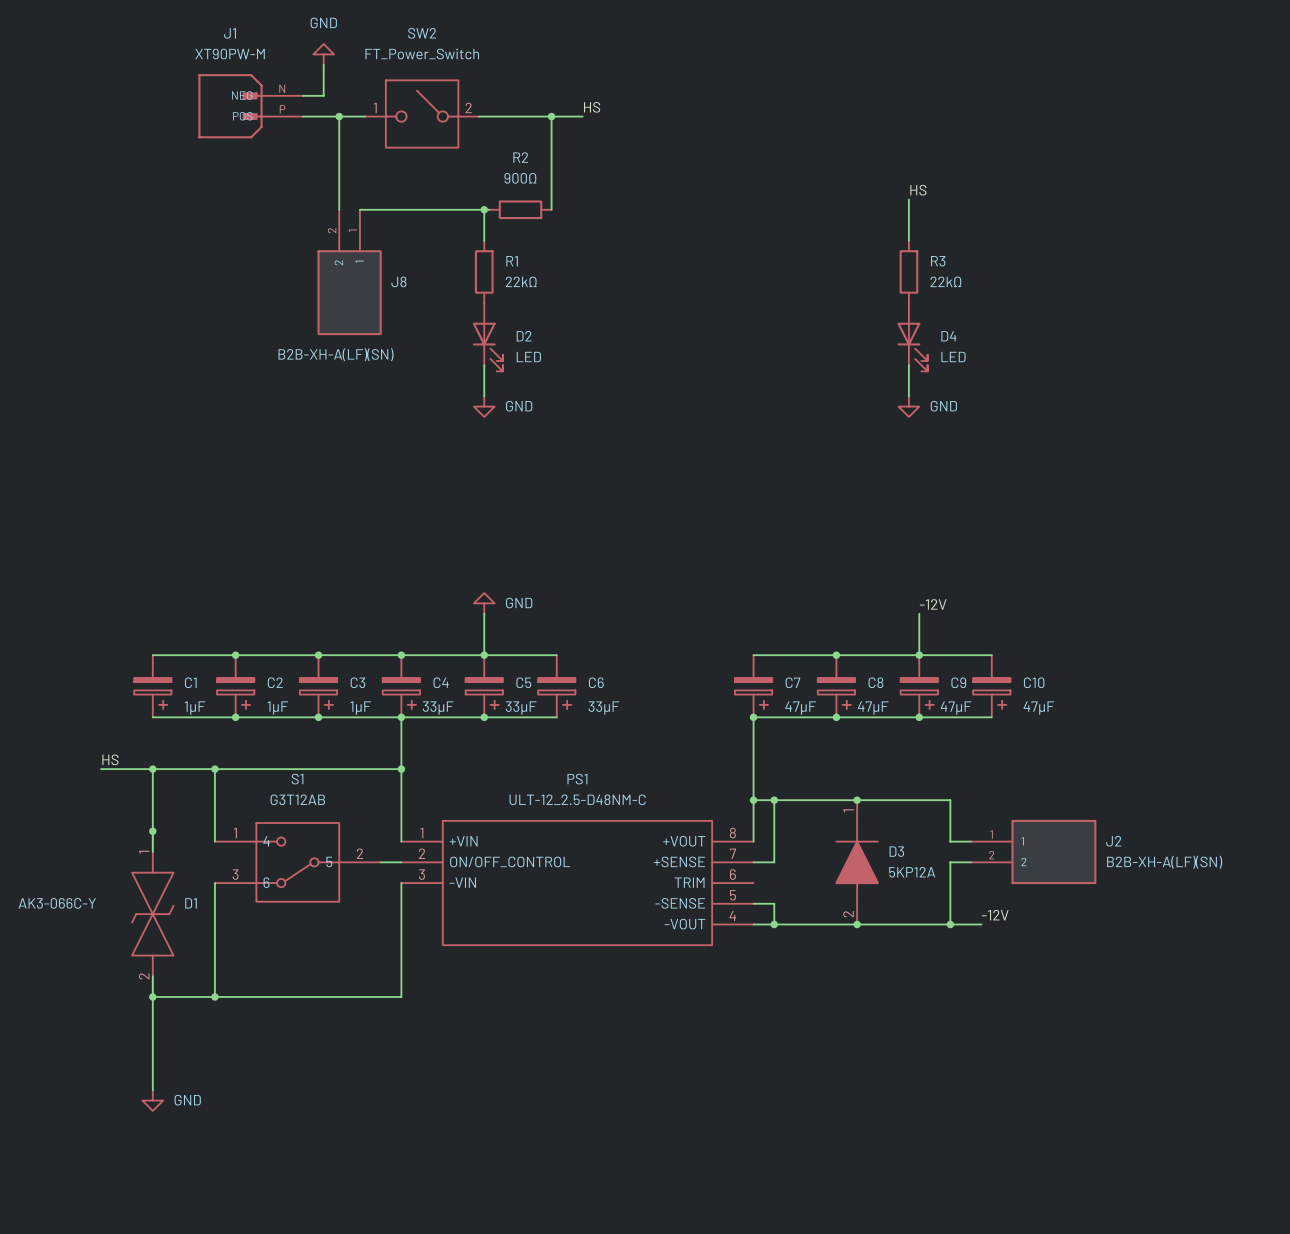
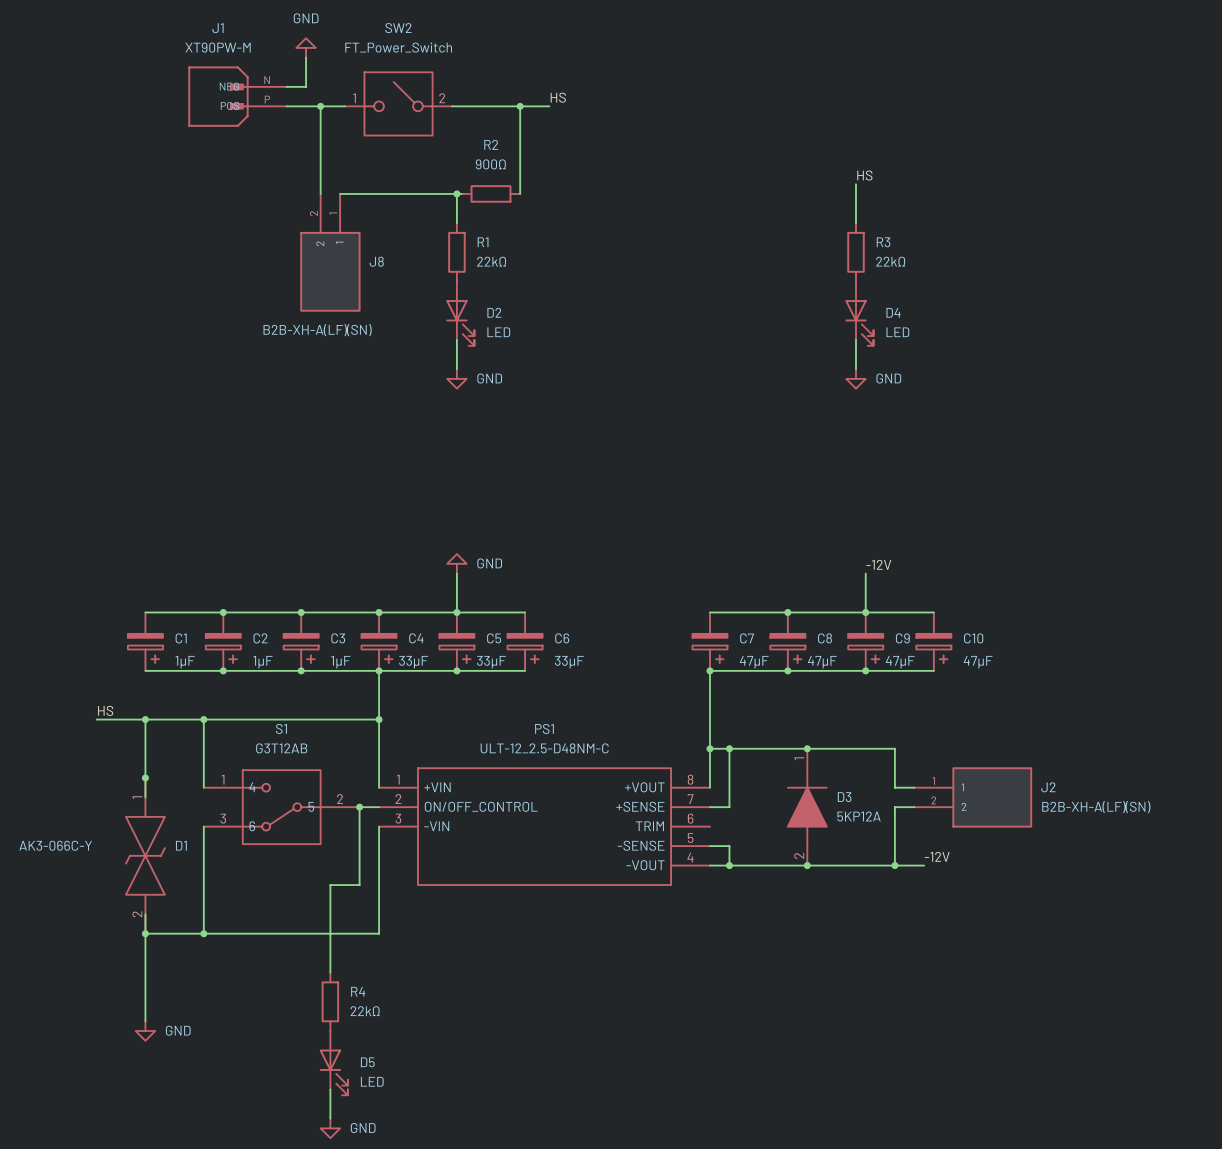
wire: none -> (359, 807) (359, 885) (330, 885) (330, 972)
junction: none -> (359, 807)
R4: none -> 22kΩ (330, 1001)
D5: none -> LED (333, 1063)
wire: none -> (330, 1089) (330, 1118)
power symbol: none -> GND (330, 1128)

